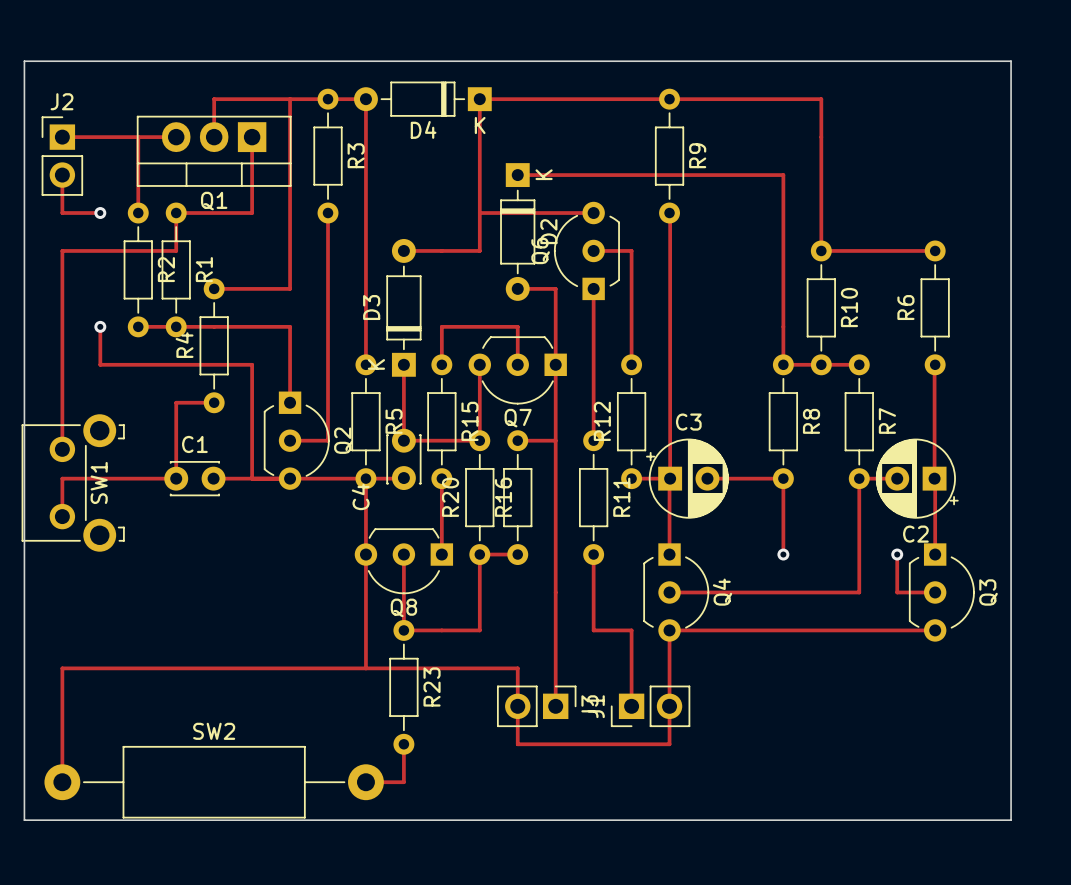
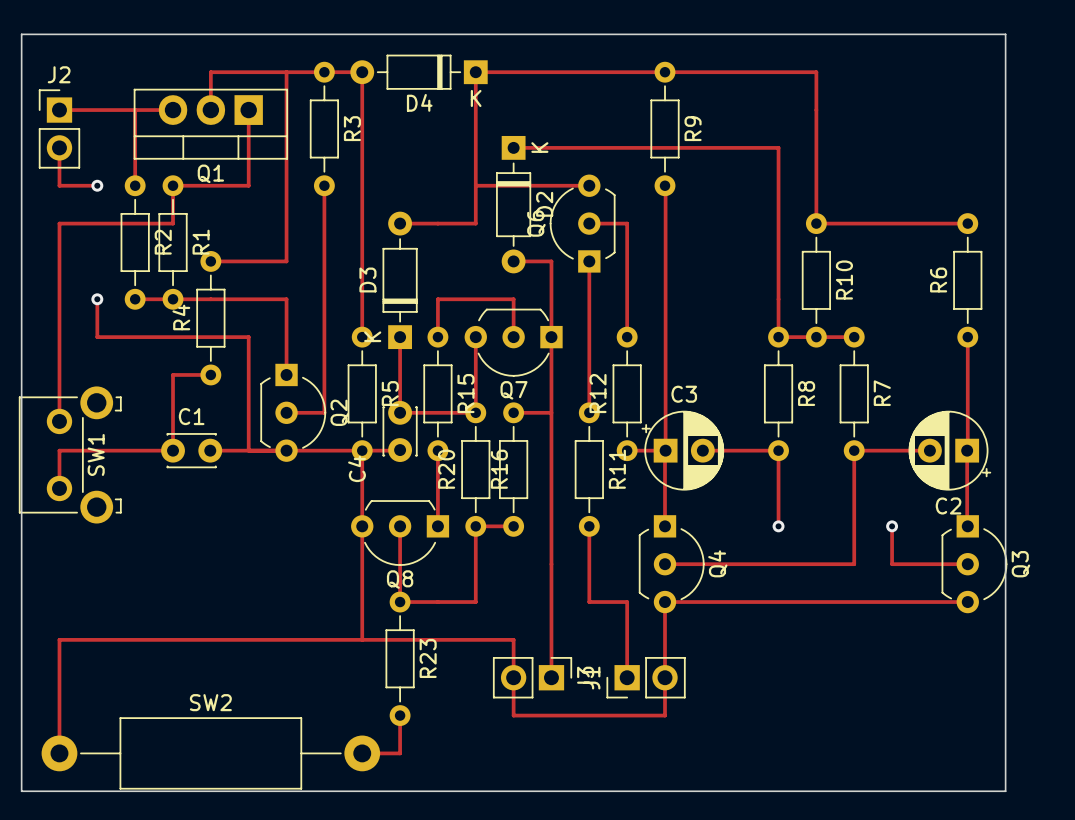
track: none -> (929, 223) (967, 223)
R6 position: (935, 307) -> (967, 280)
track: (935, 364) (935, 554) -> none
track: none -> (967, 337) (967, 526)
track: none -> (892, 450) (929, 450)
C2 position: (917, 478) -> (949, 450)
track: none -> (929, 564) (967, 564)
Q3 position: (941, 592) -> (974, 564)
track: none -> (929, 602) (967, 602)

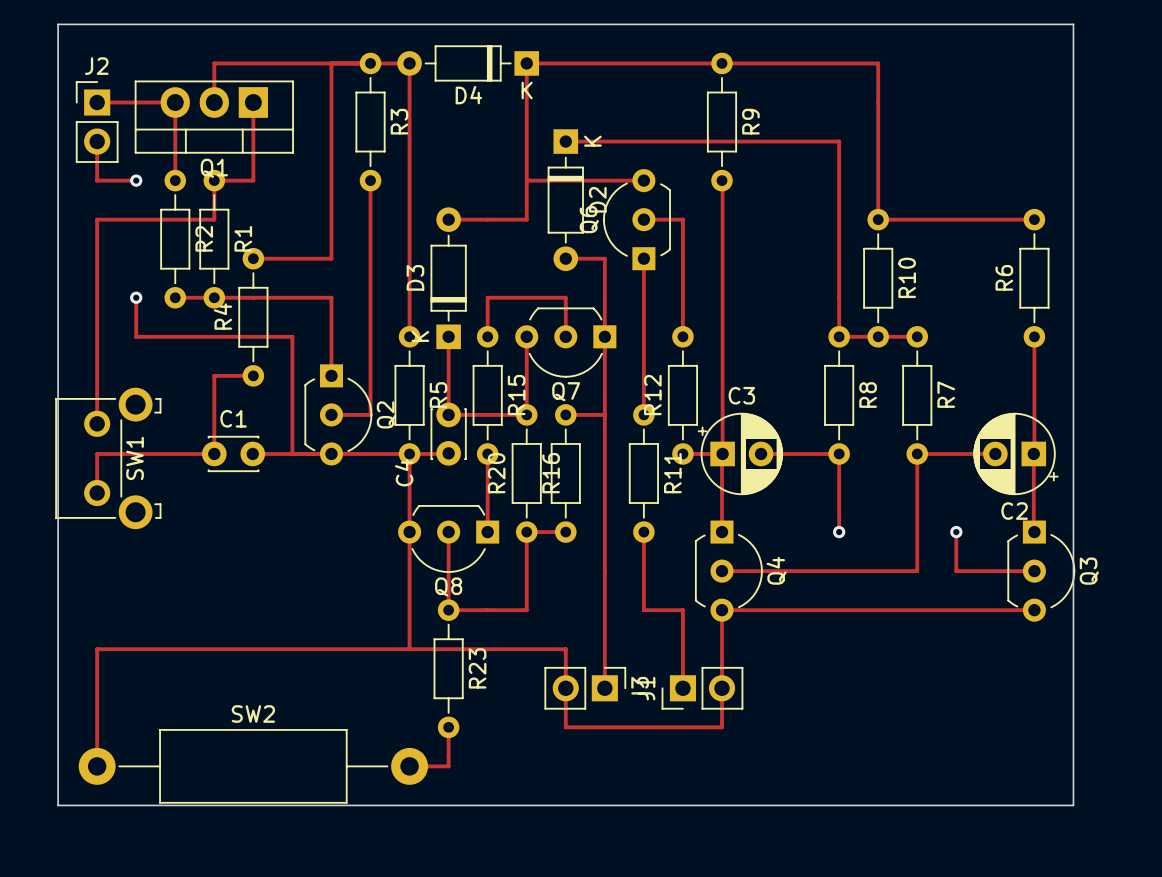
track: (210, 72) (210, 110) -> (253, 63) (214, 63) (214, 102)
track: (135, 110) (173, 110) -> none
track: (248, 110) (248, 185) (210, 185) -> (253, 102) (253, 180)
Q1 position: (210, 124) -> (214, 117)

